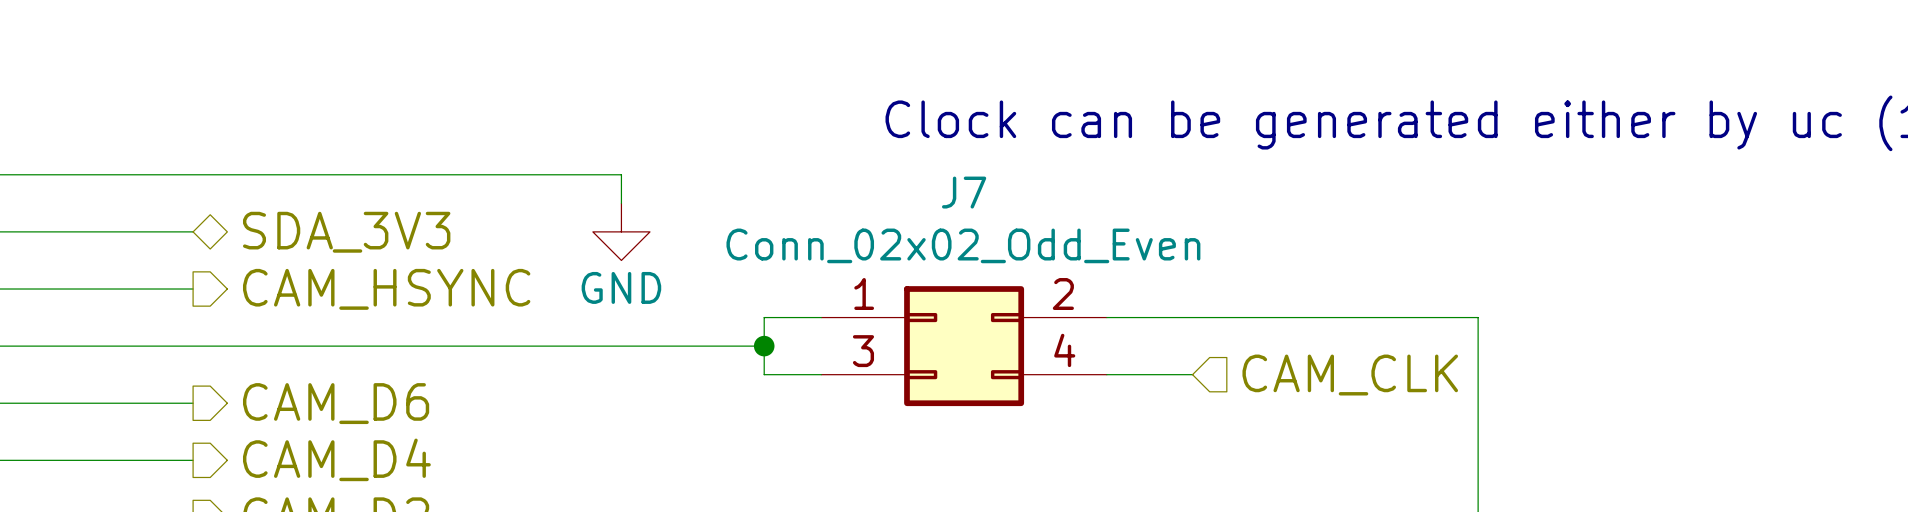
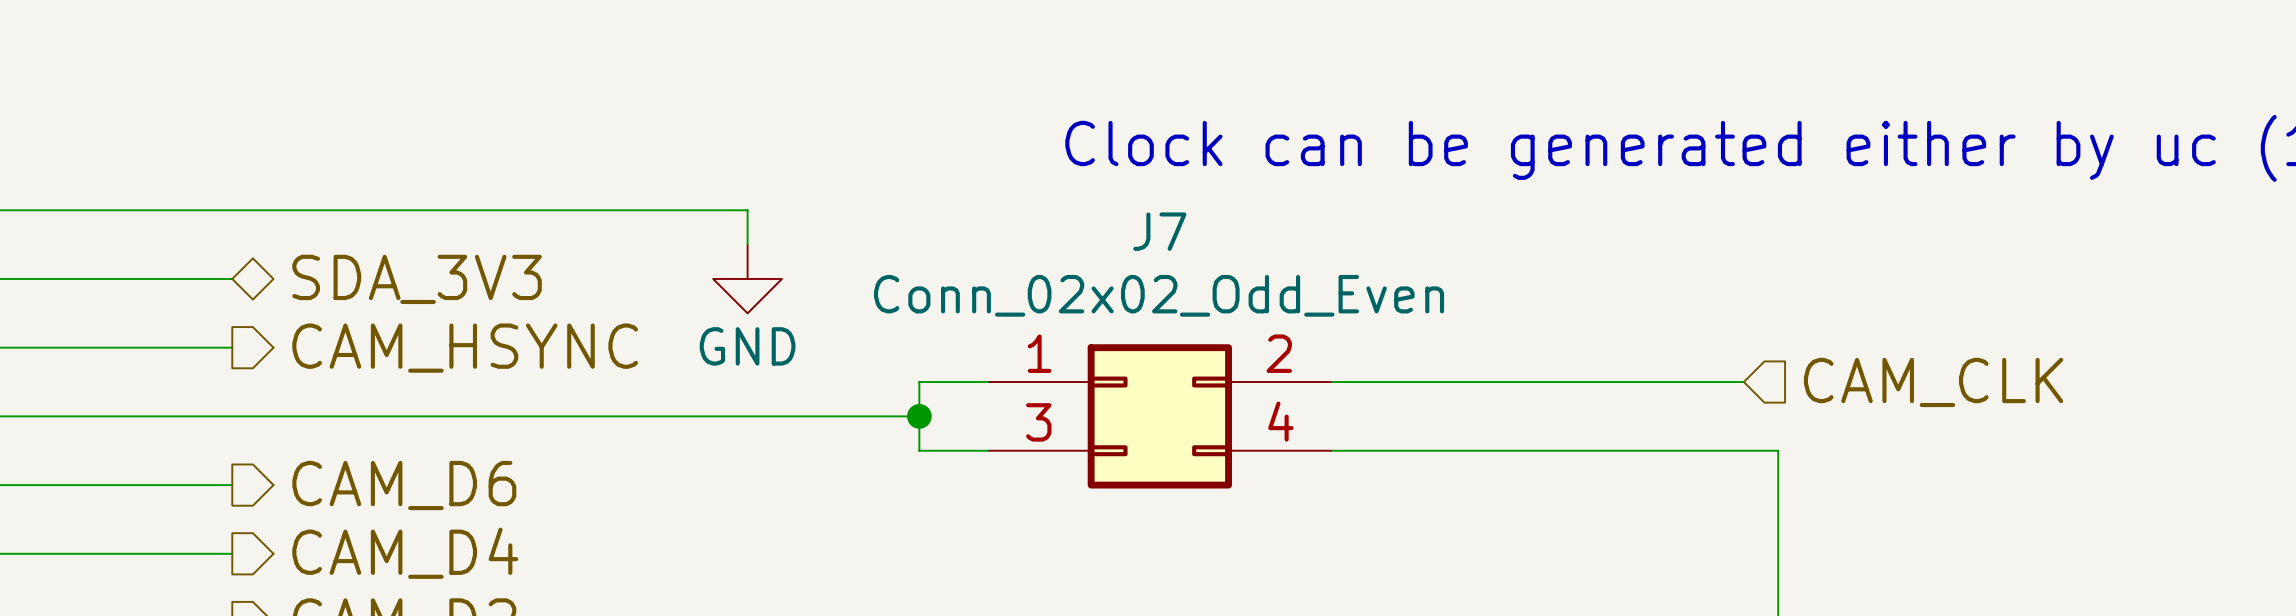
wire: (1449, 317) (1478, 317) (1478, 374) -> (1434, 450) (1778, 450)
hierarchical label position: CAM_CLK (1350, 375) -> CAM_CLK (1933, 382)

